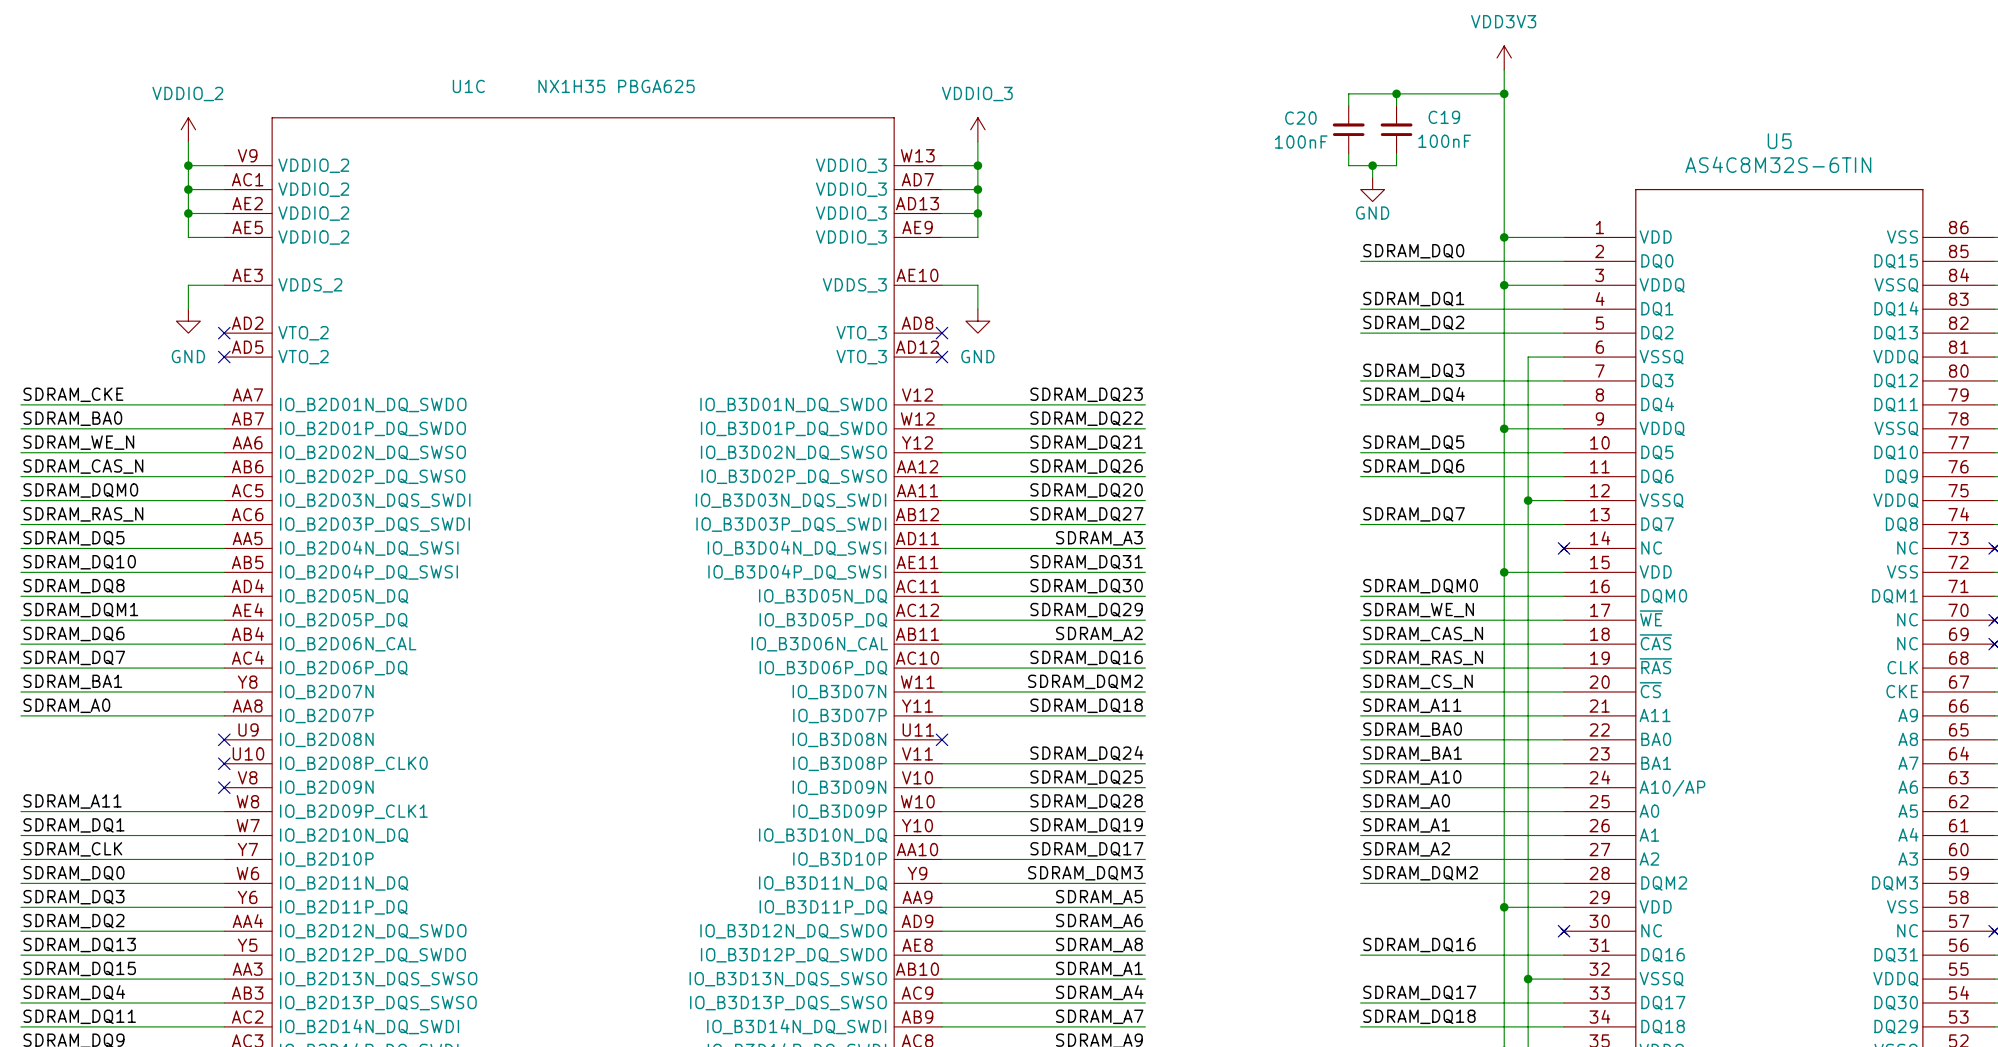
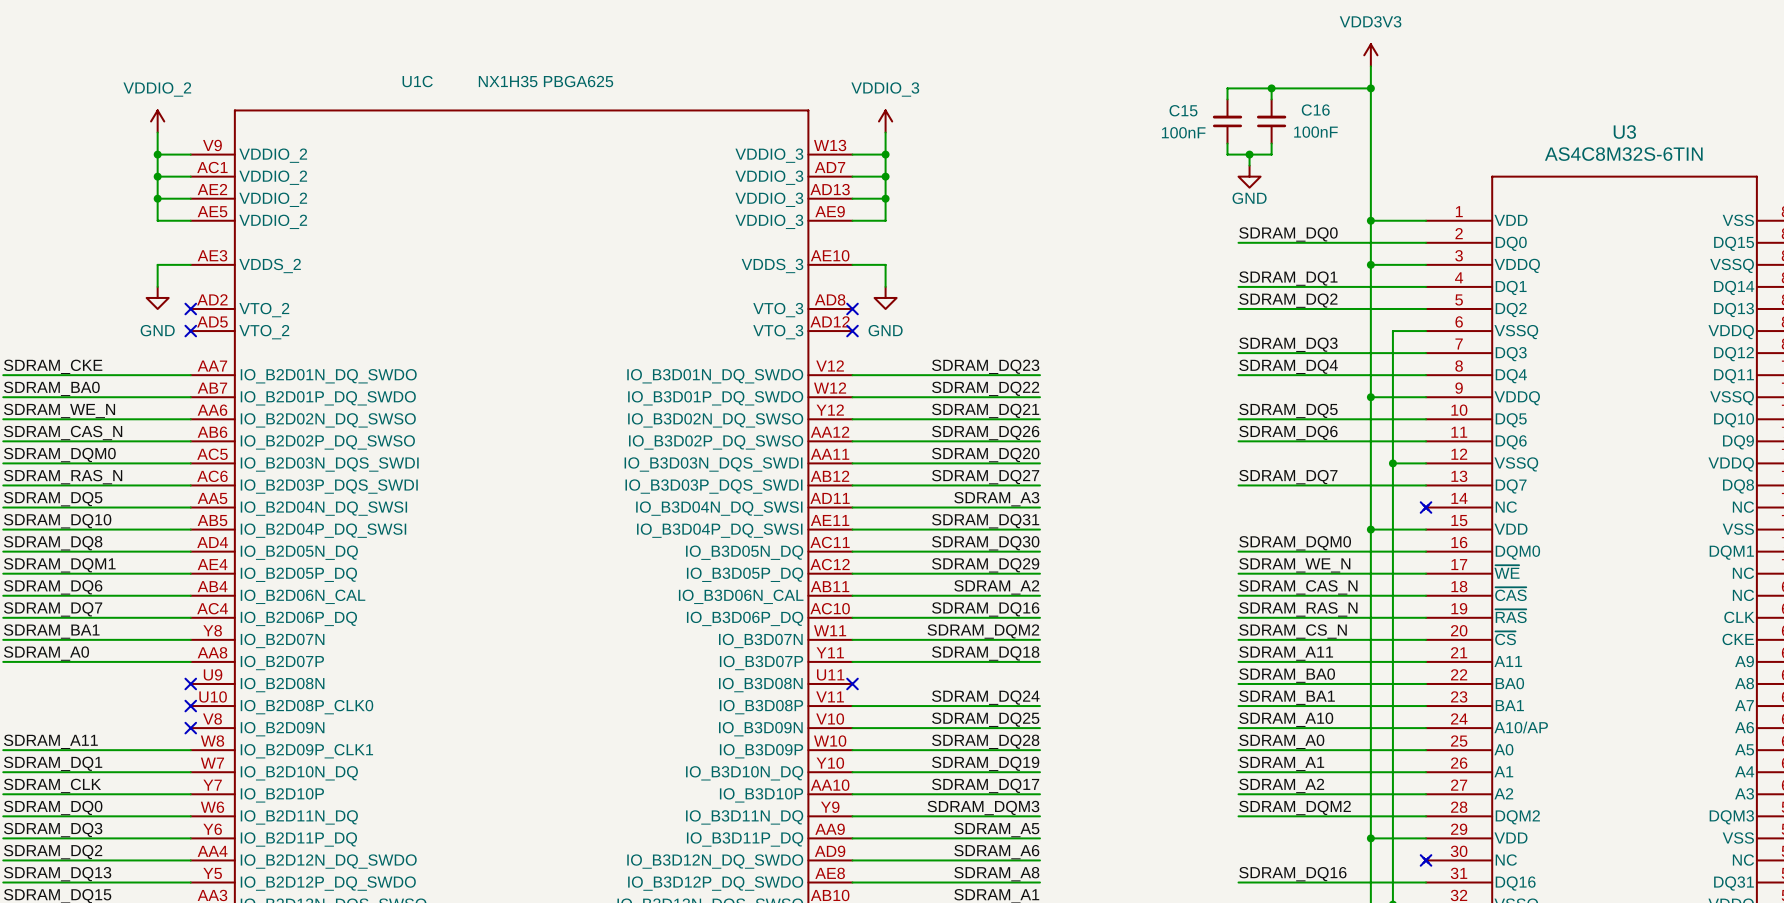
C19 name: C19 (1444, 117) -> C16 (1315, 110)
C20 name: C20 (1300, 118) -> C15 (1183, 110)
U5 name: U5 (1779, 141) -> U3 (1624, 132)

